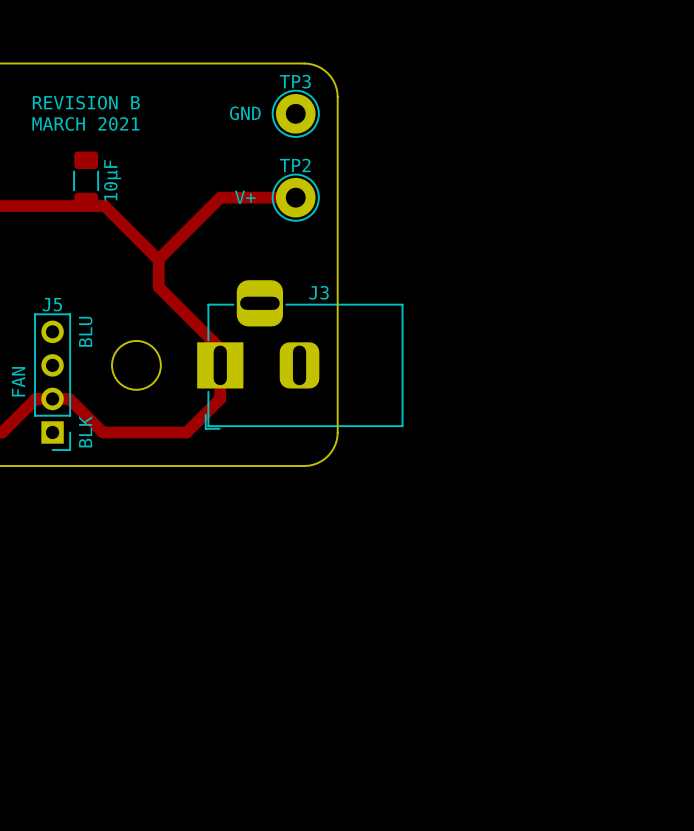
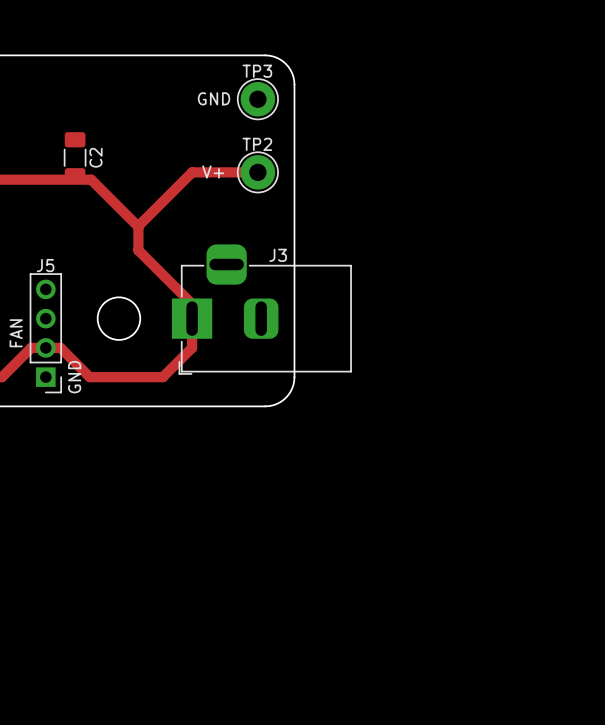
text: REVISION B (86, 102) -> none
text: MARCH 2021 (85, 123) -> none
text: 10μF (112, 180) -> none
C2 name: none -> C2 (95, 157)
text: BLU (85, 331) -> none
text: BLK (85, 431) -> GND (74, 377)

